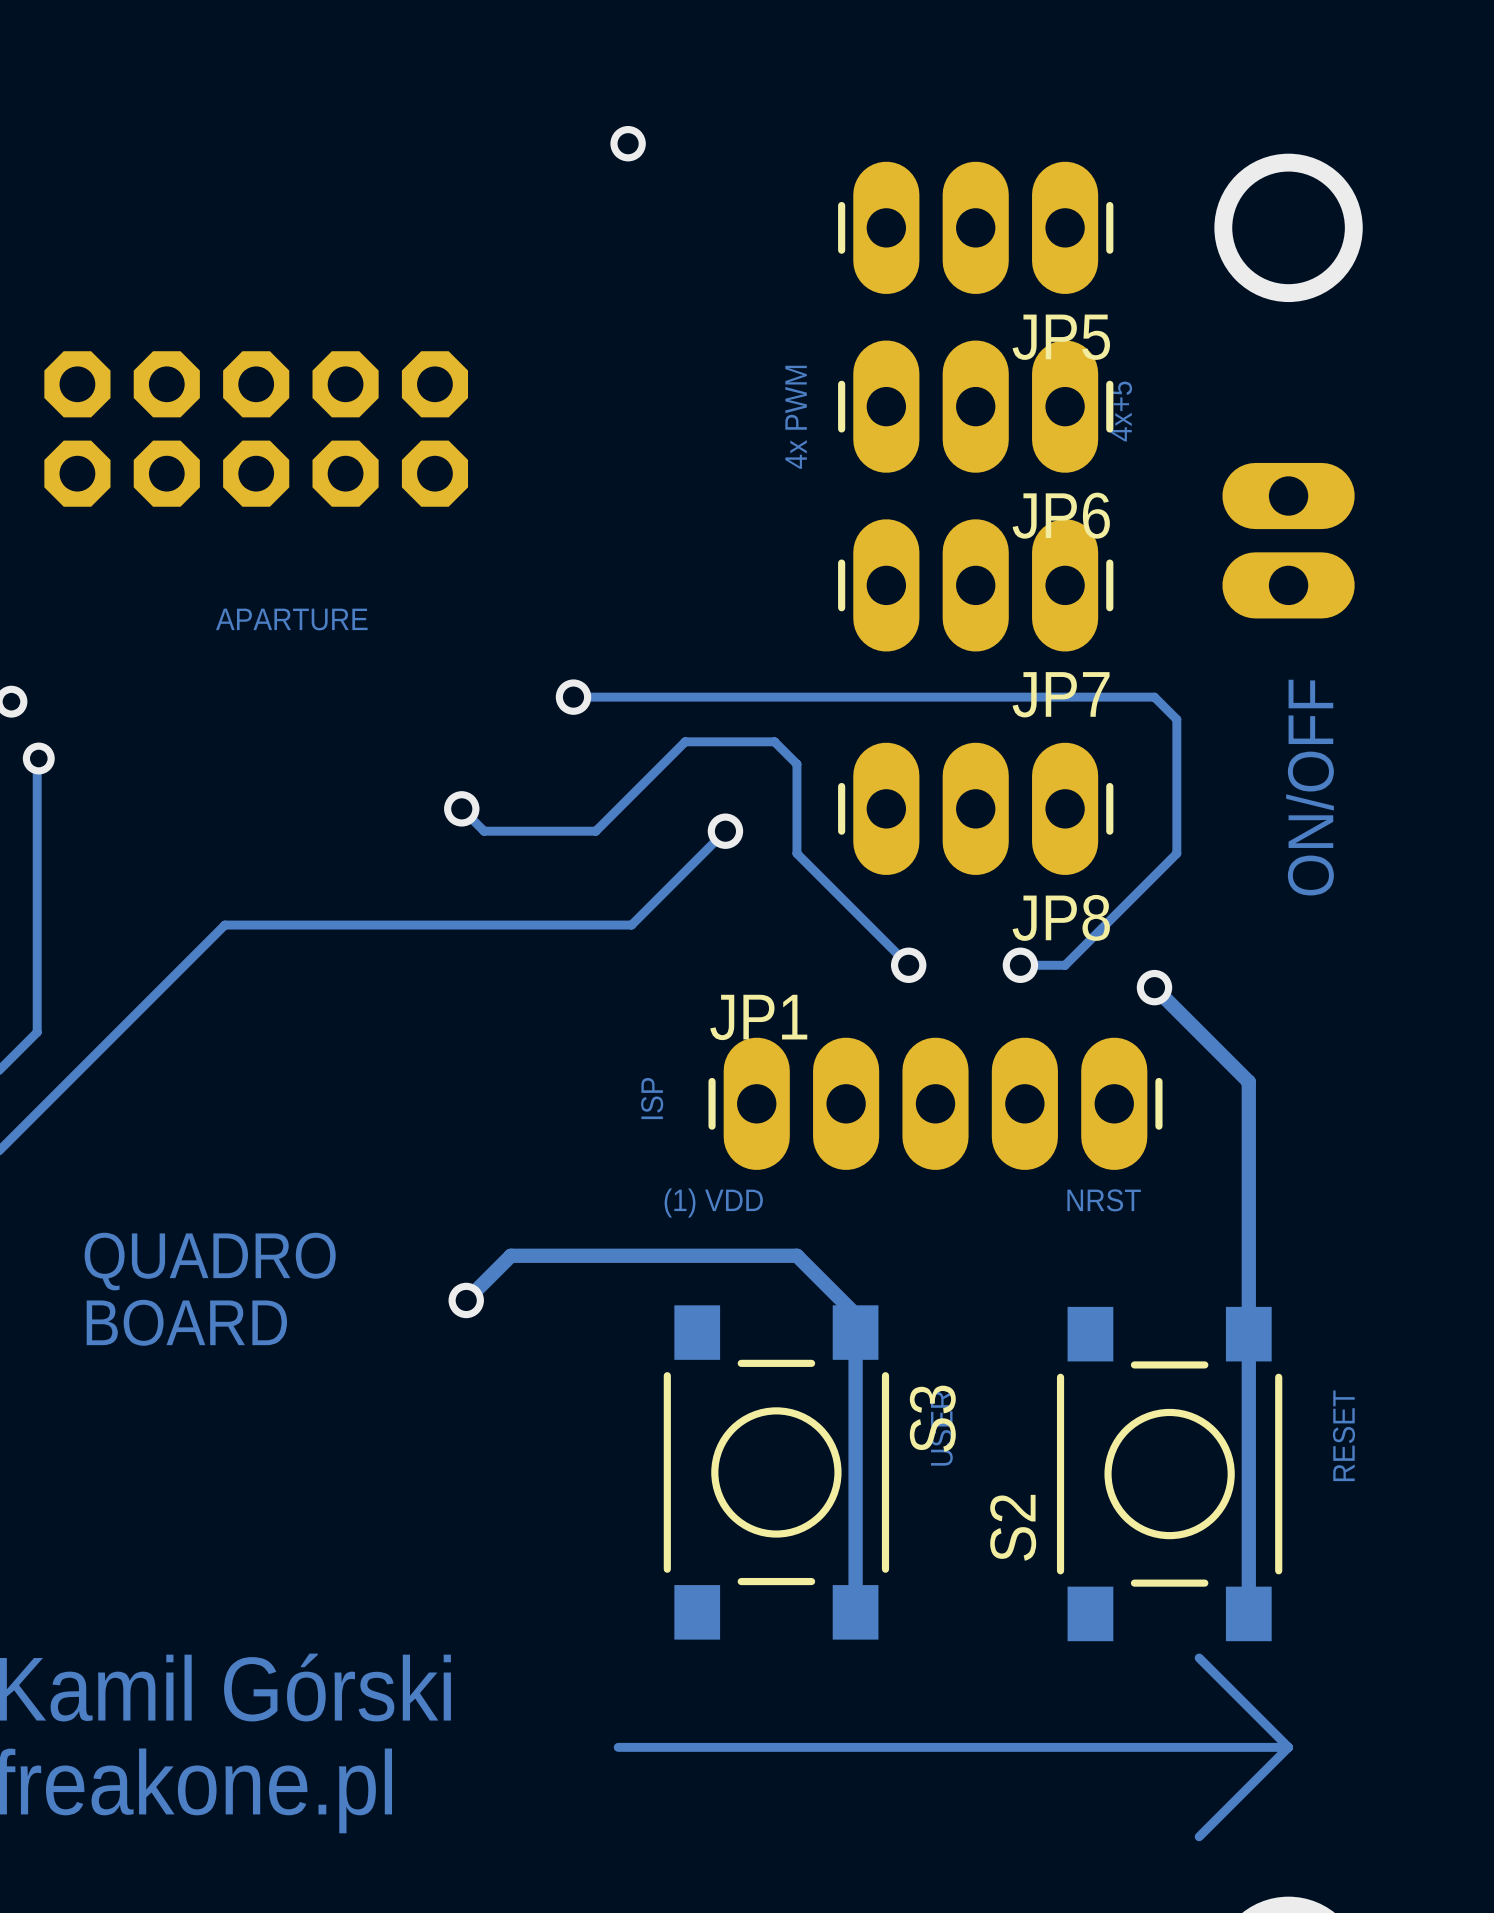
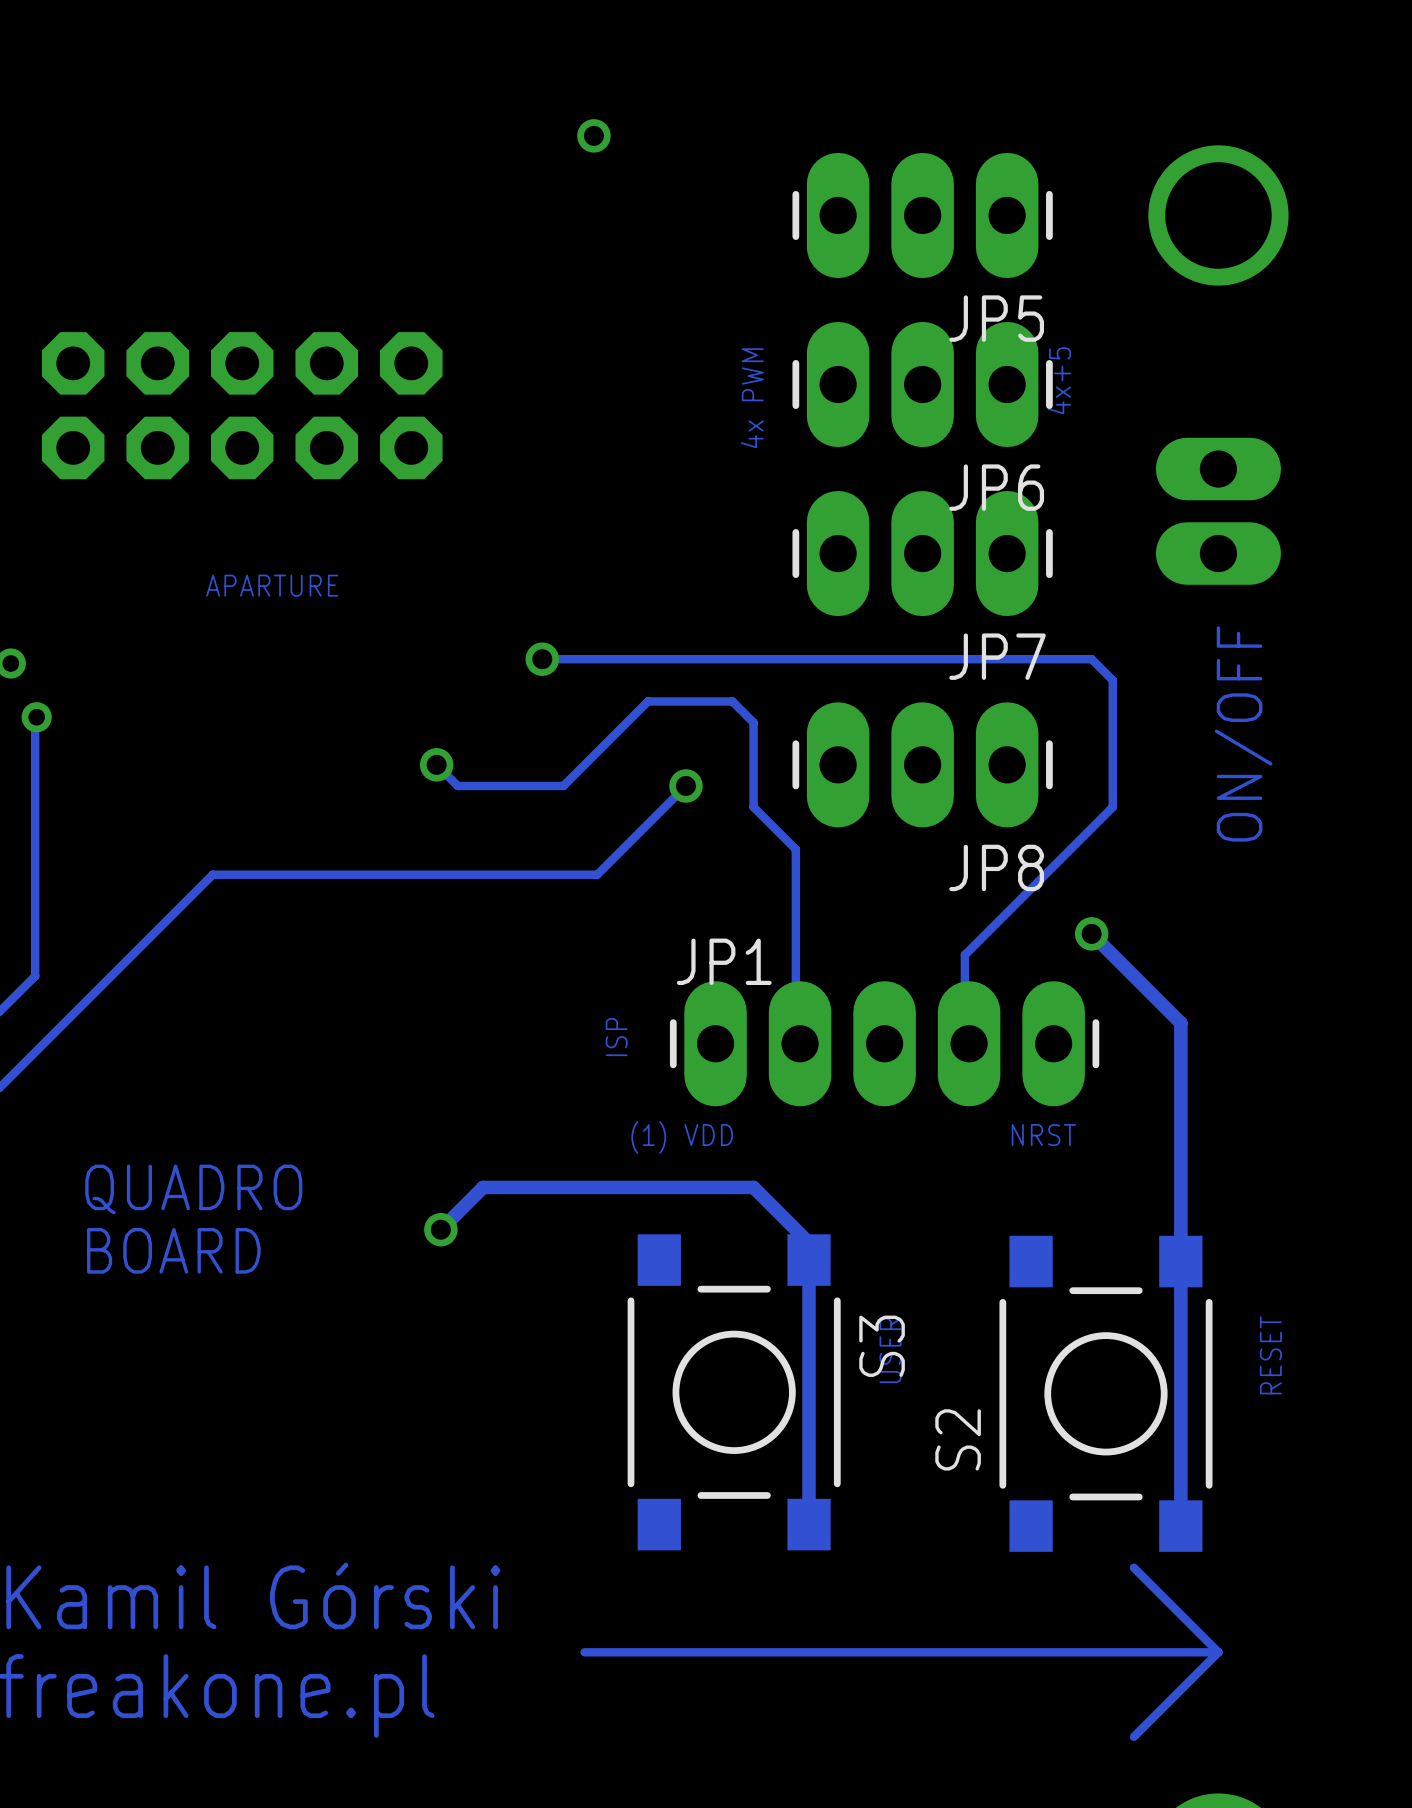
track: (841, 898) (908, 965) -> (795, 849) (795, 1043) (800, 1043)
via: (908, 965) -> none
via: (1020, 965) -> none
track: (1065, 965) (1020, 965) -> (1007, 912) (964, 955) (964, 1039) (969, 1043)

